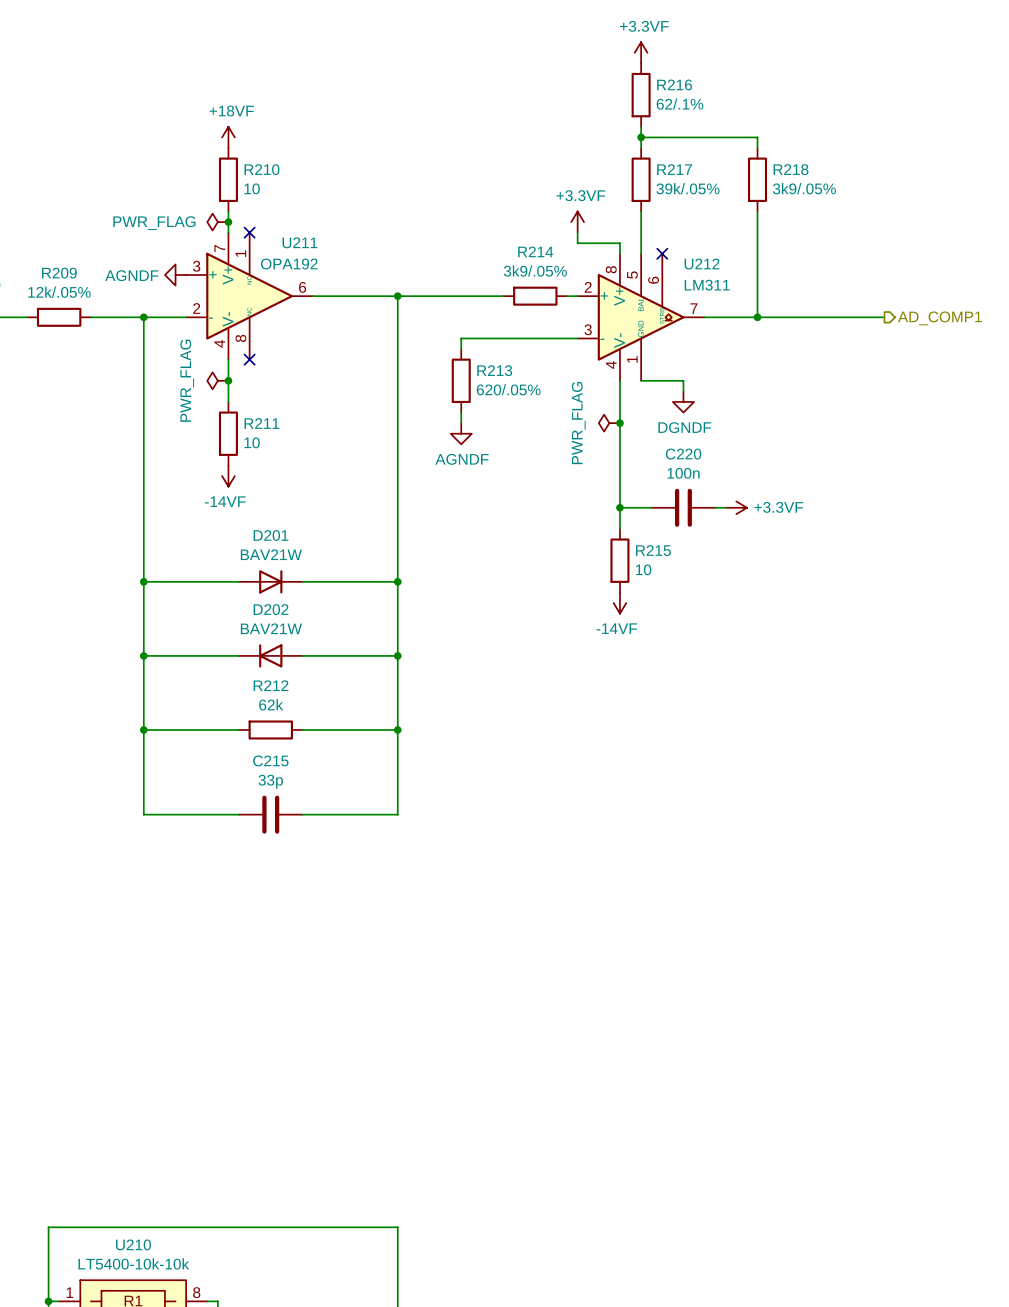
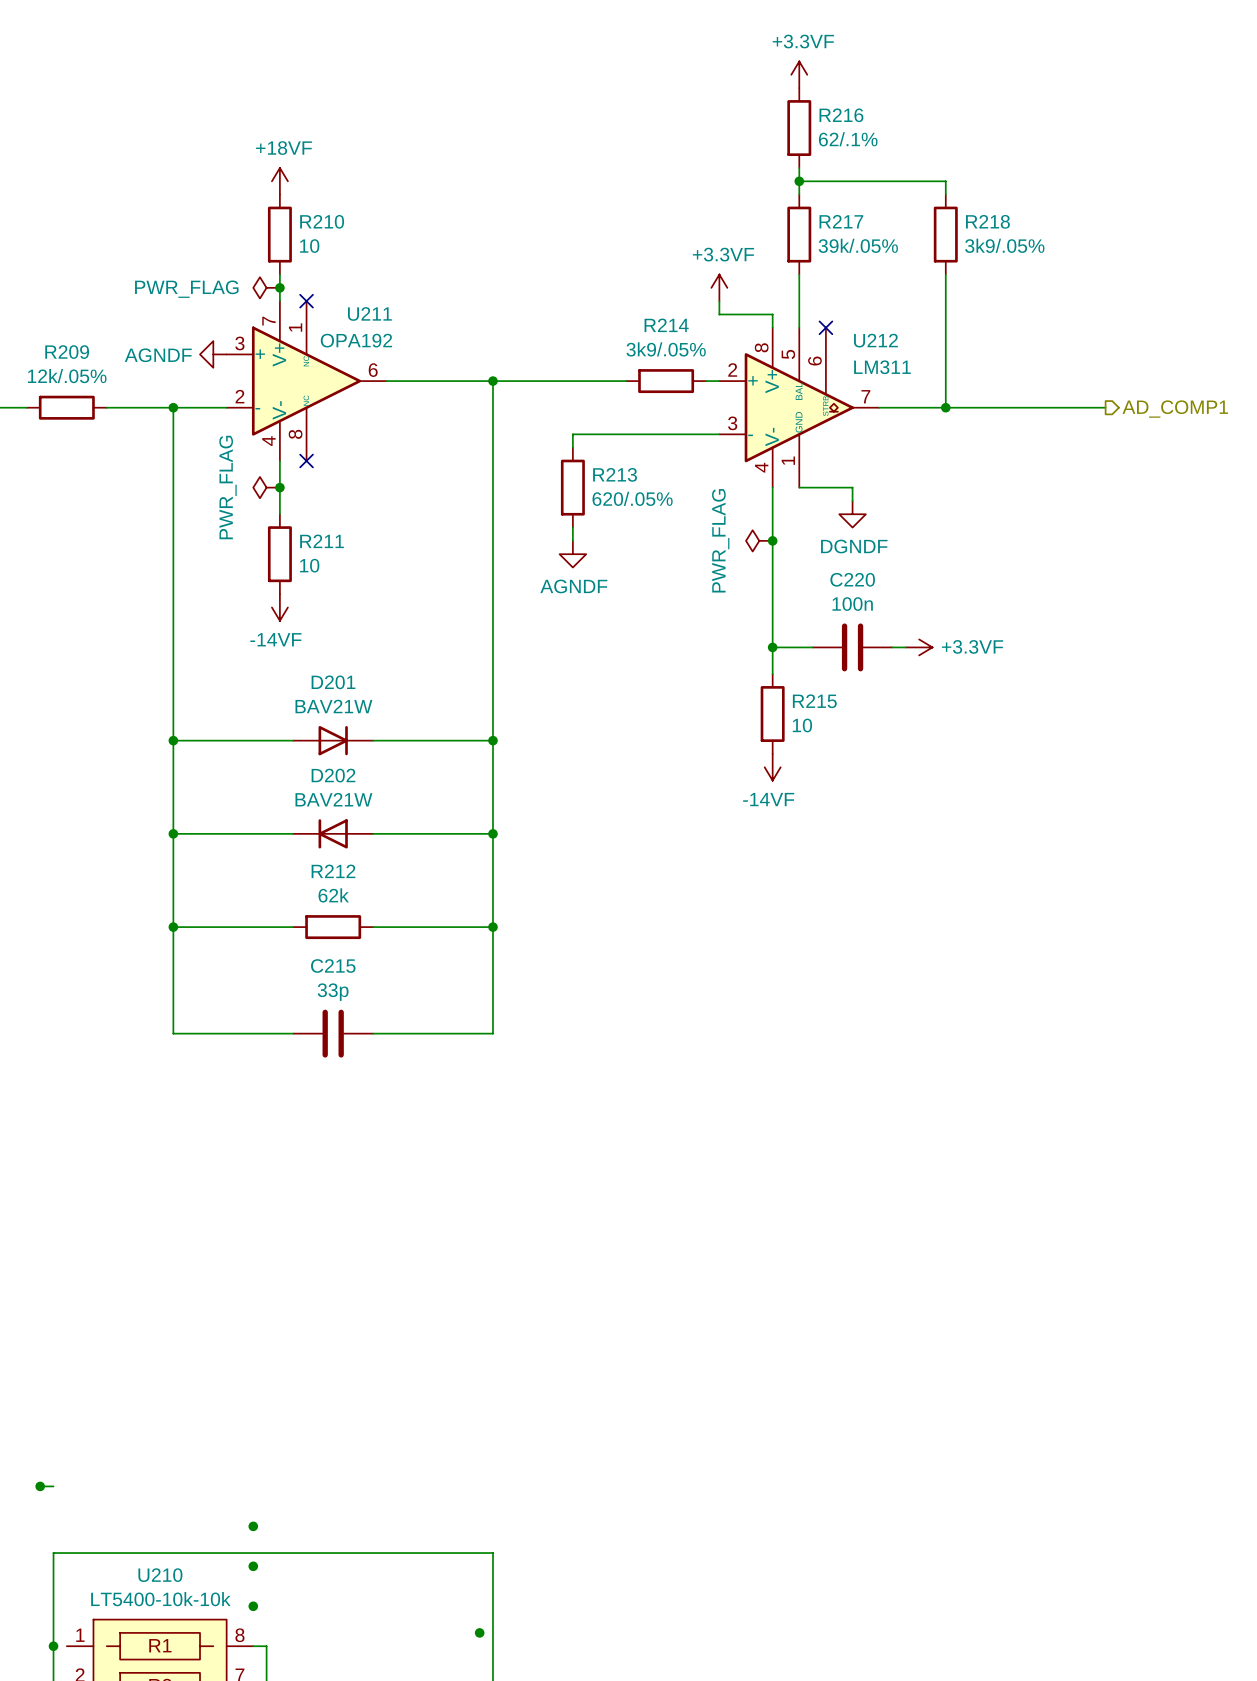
junction: none -> (40, 1486)
junction: none -> (253, 1526)
junction: none -> (253, 1566)
junction: none -> (253, 1606)
junction: none -> (479, 1632)
wire: (48, 1301) (59, 1301) -> (40, 1486) (53, 1486)

